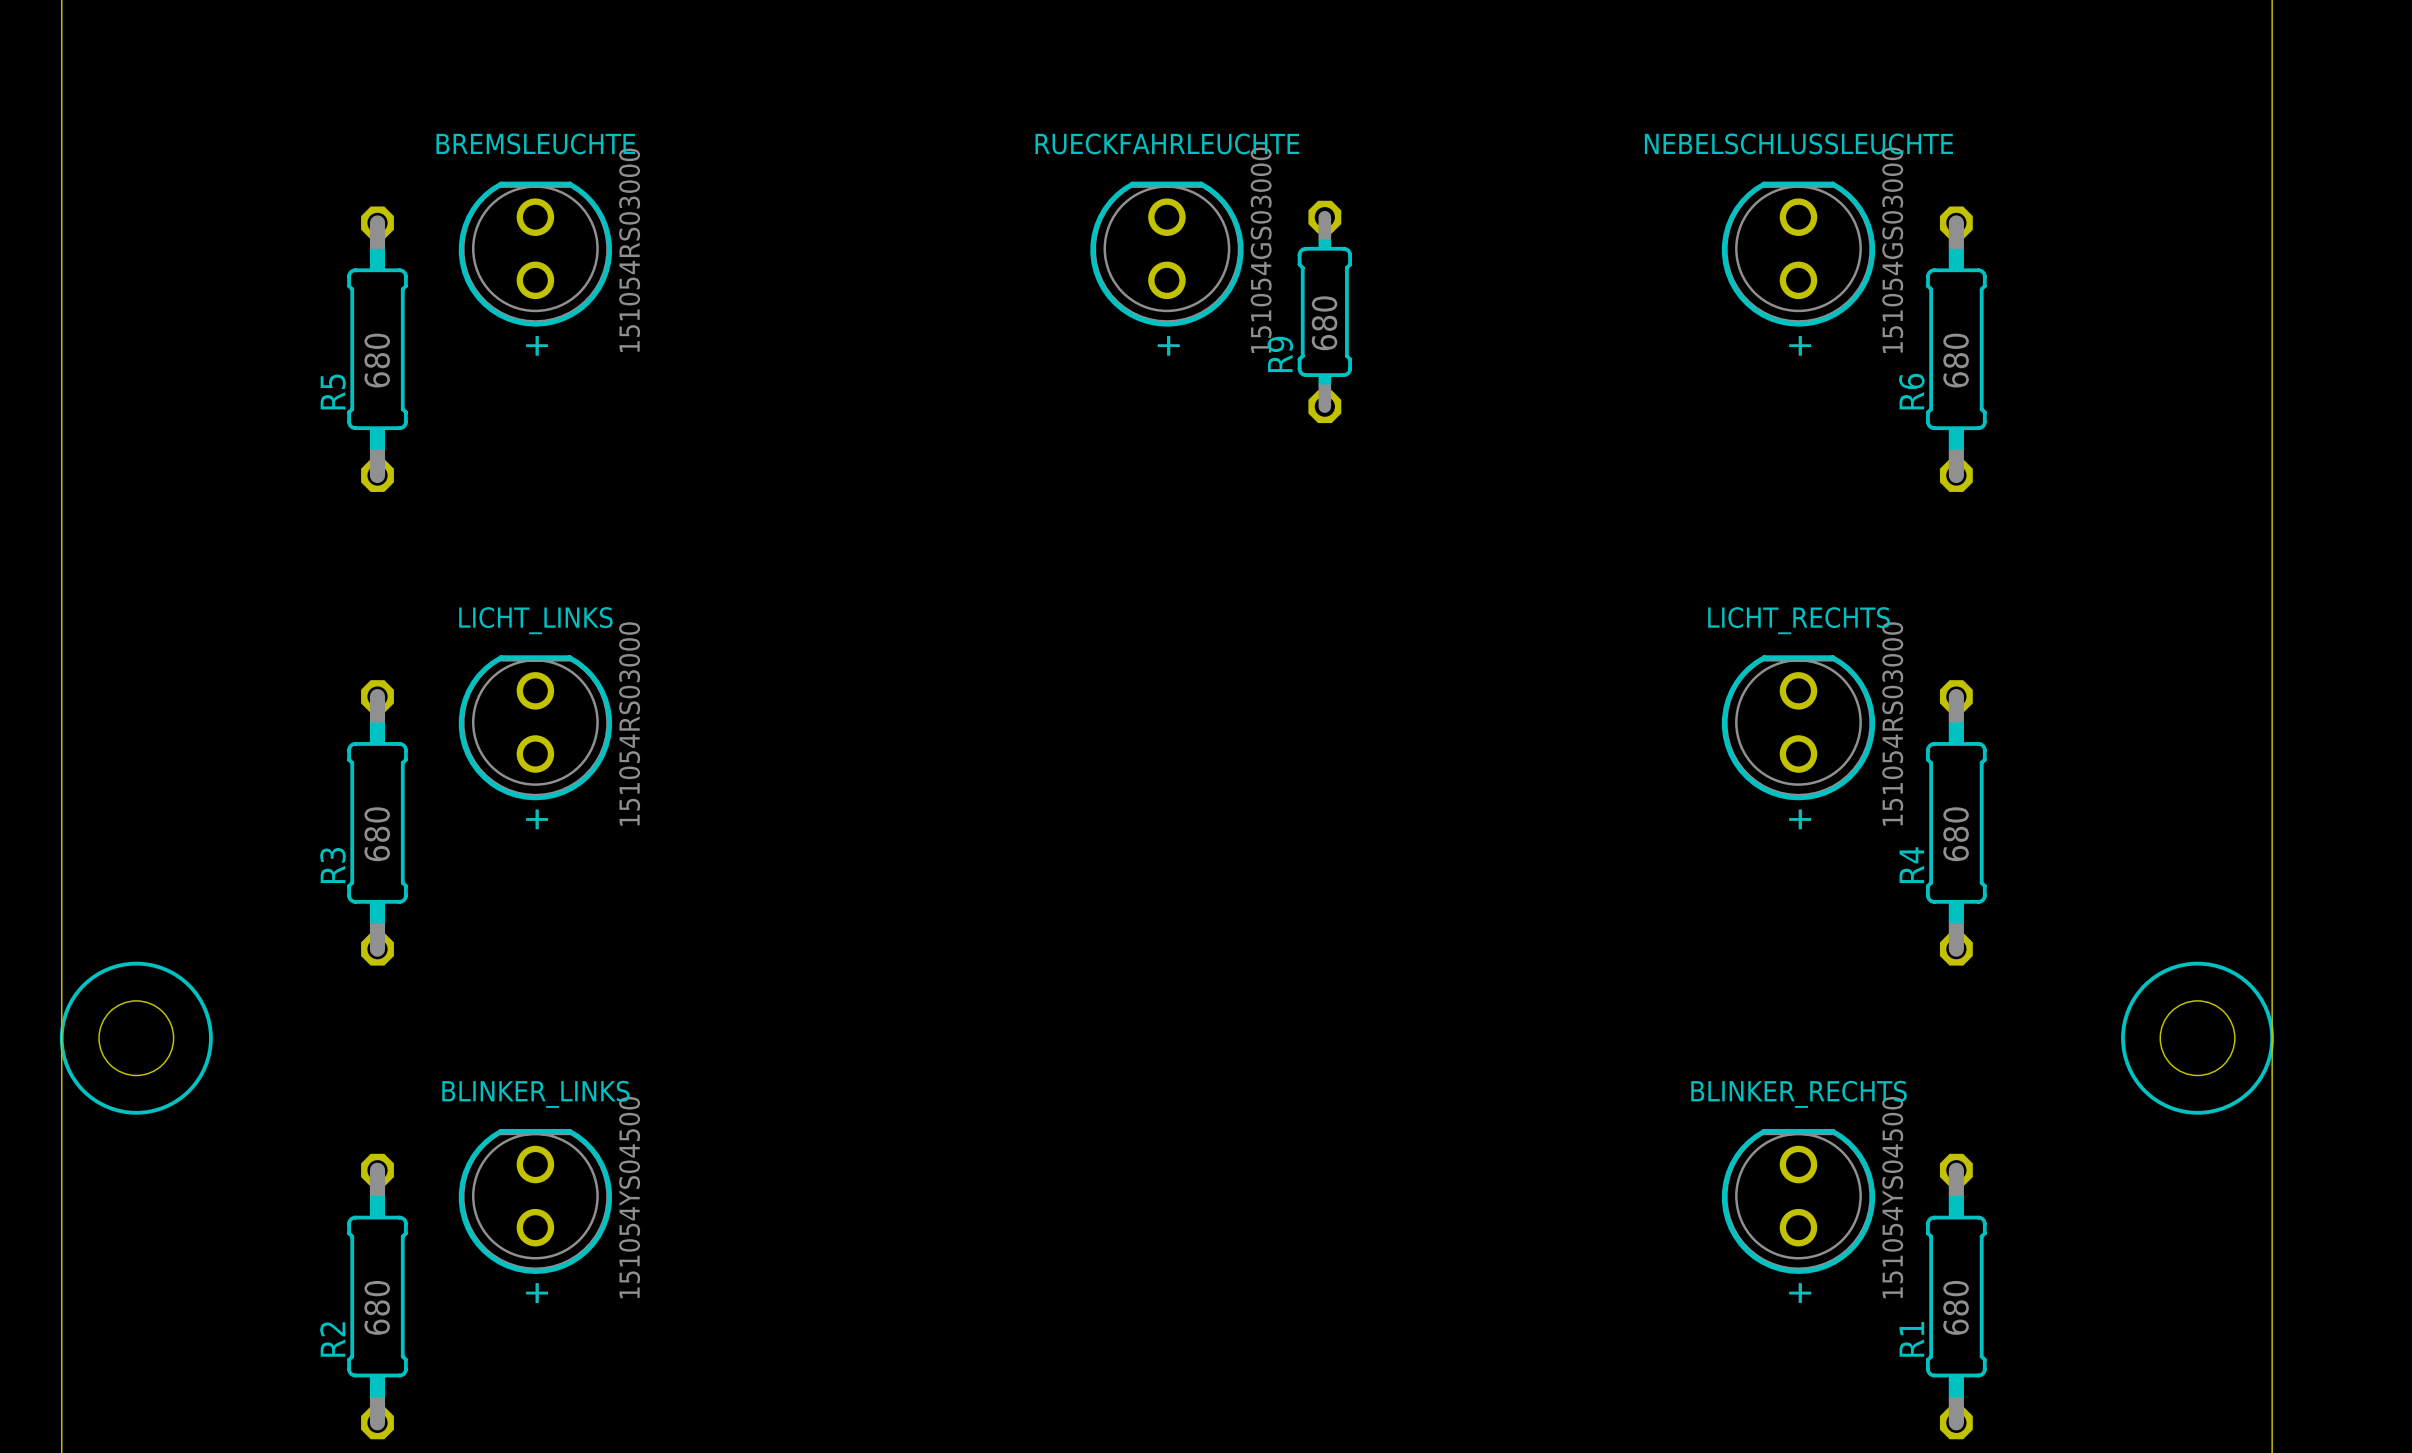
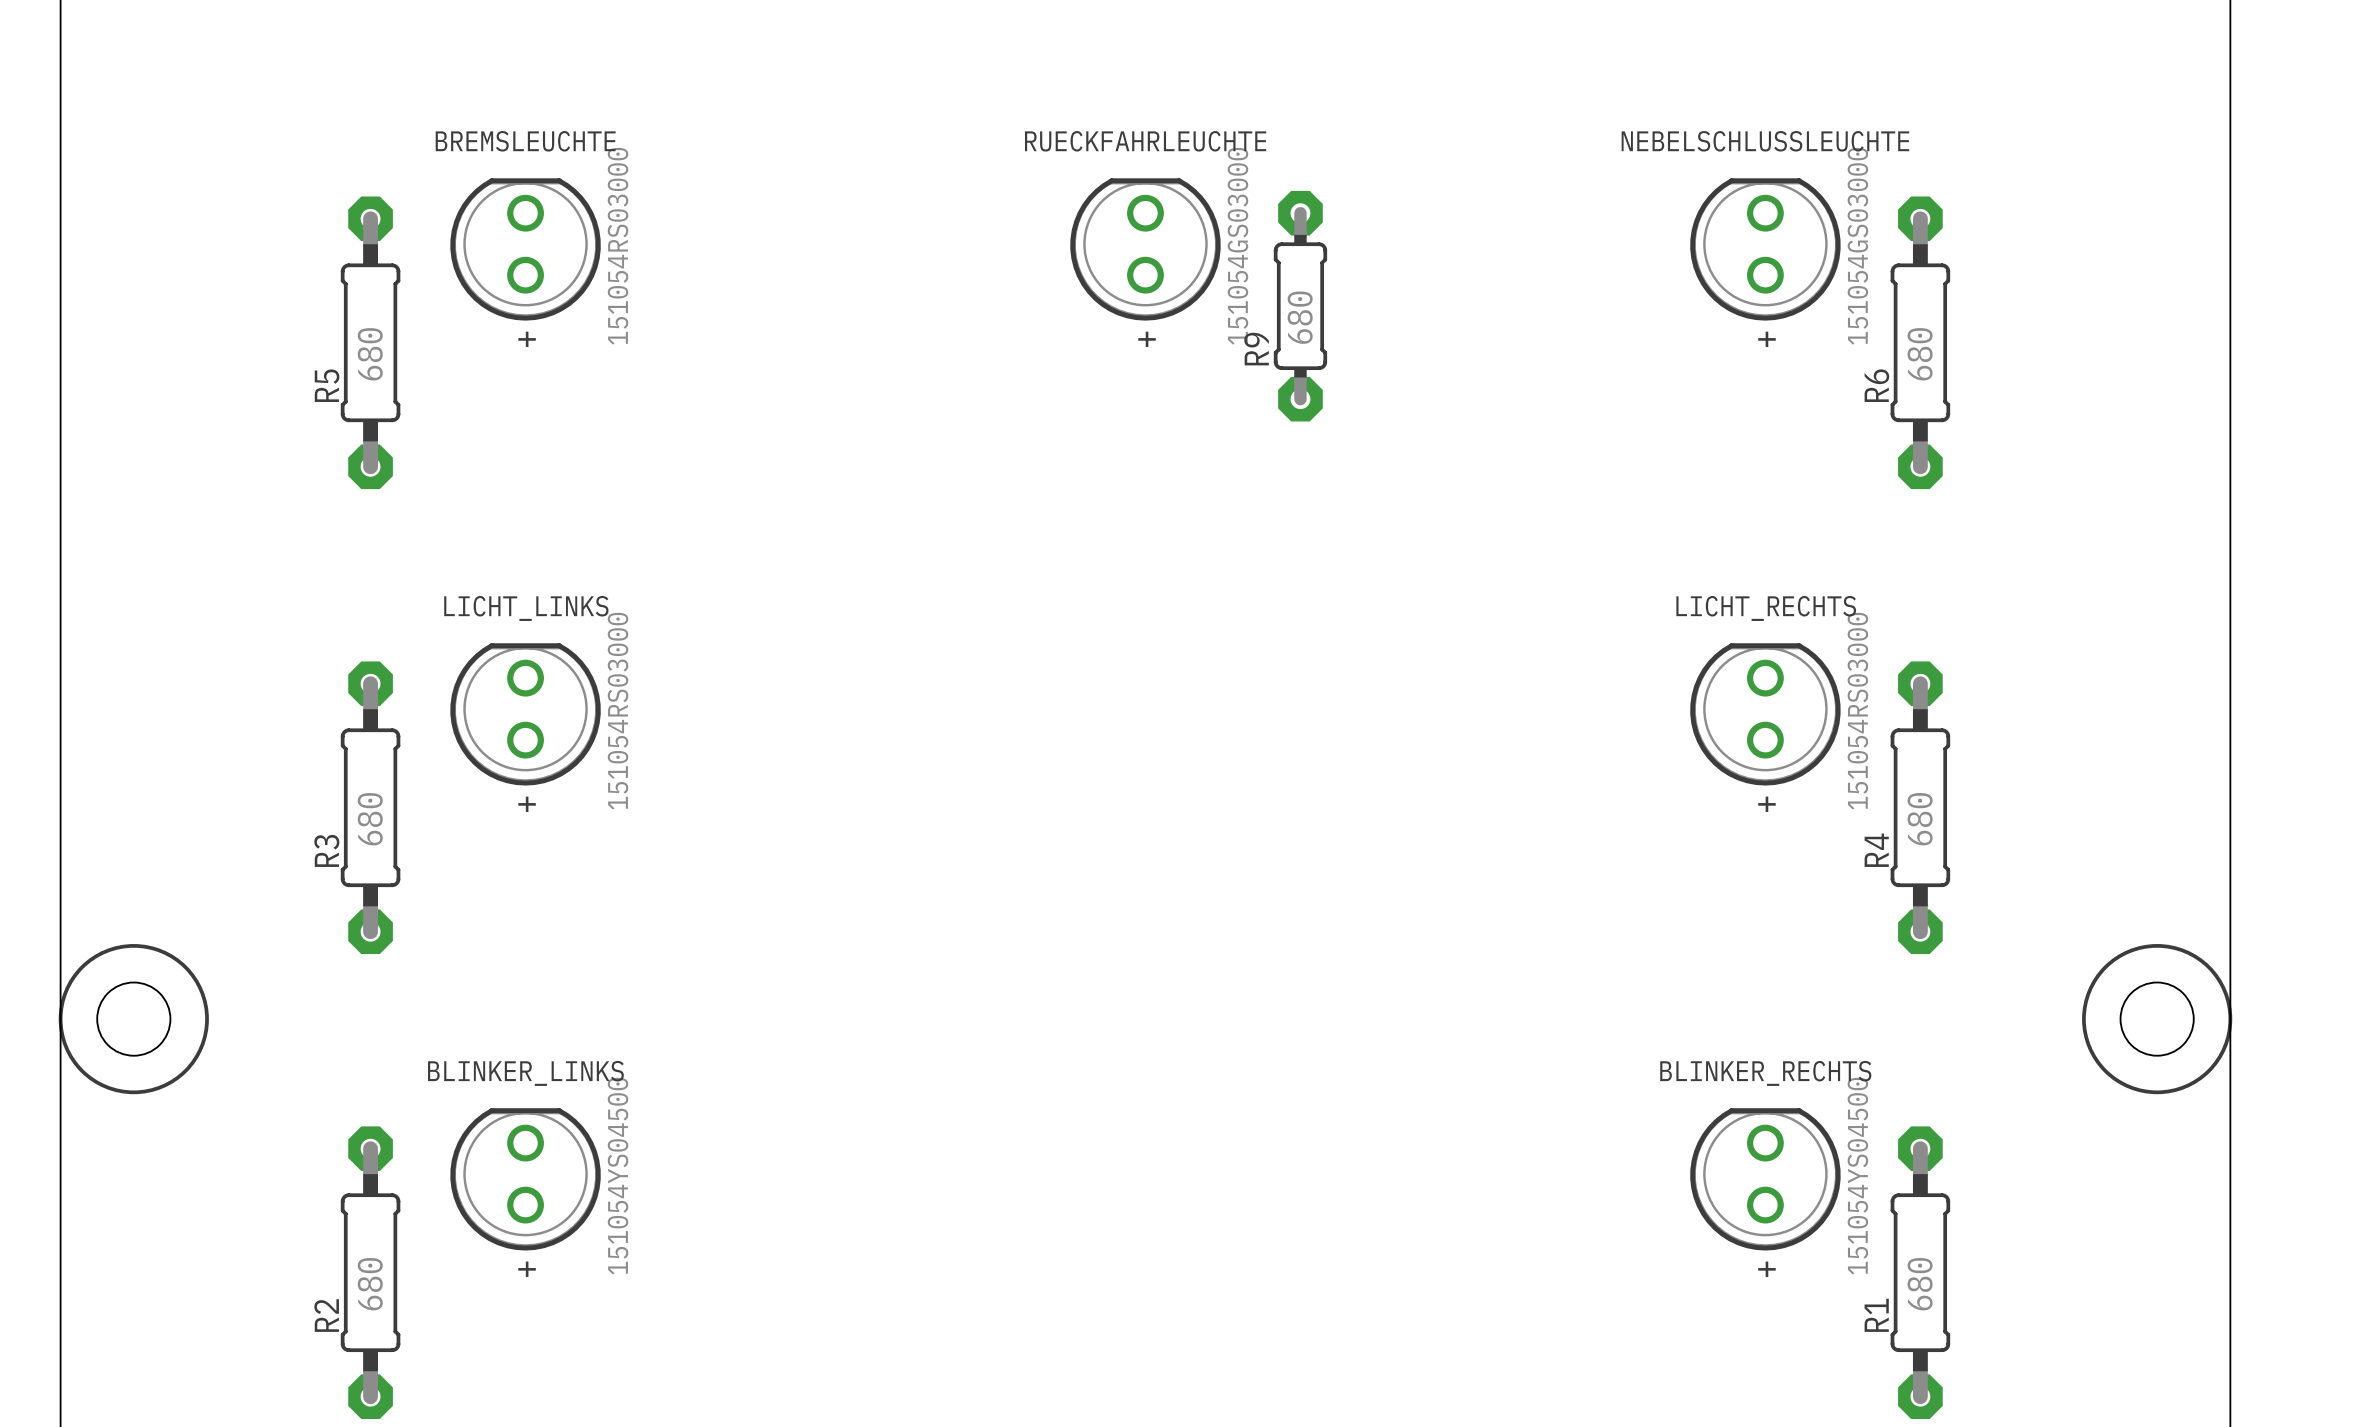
R9 footprint: [1297, 200, 1352, 424] -> [1273, 190, 1328, 422]
R5 footprint: [347, 206, 408, 492] -> [340, 196, 401, 490]
R6 footprint: [1926, 206, 1987, 492] -> [1890, 196, 1951, 490]
R3 footprint: [347, 680, 408, 966] -> [340, 661, 401, 955]
R4 footprint: [1926, 680, 1987, 966] -> [1890, 661, 1951, 955]
R2 footprint: [347, 1153, 408, 1440] -> [340, 1126, 401, 1420]
R1 footprint: [1926, 1153, 1987, 1440] -> [1890, 1126, 1951, 1420]

